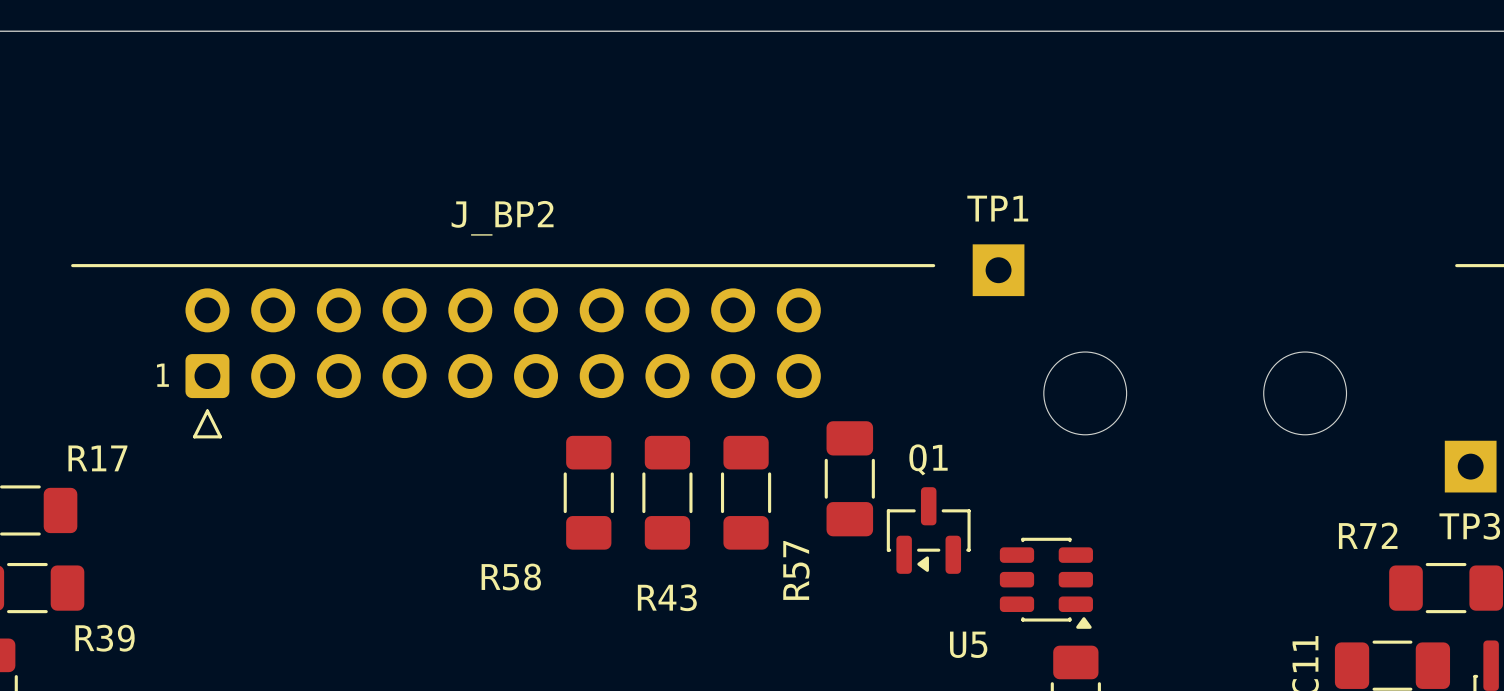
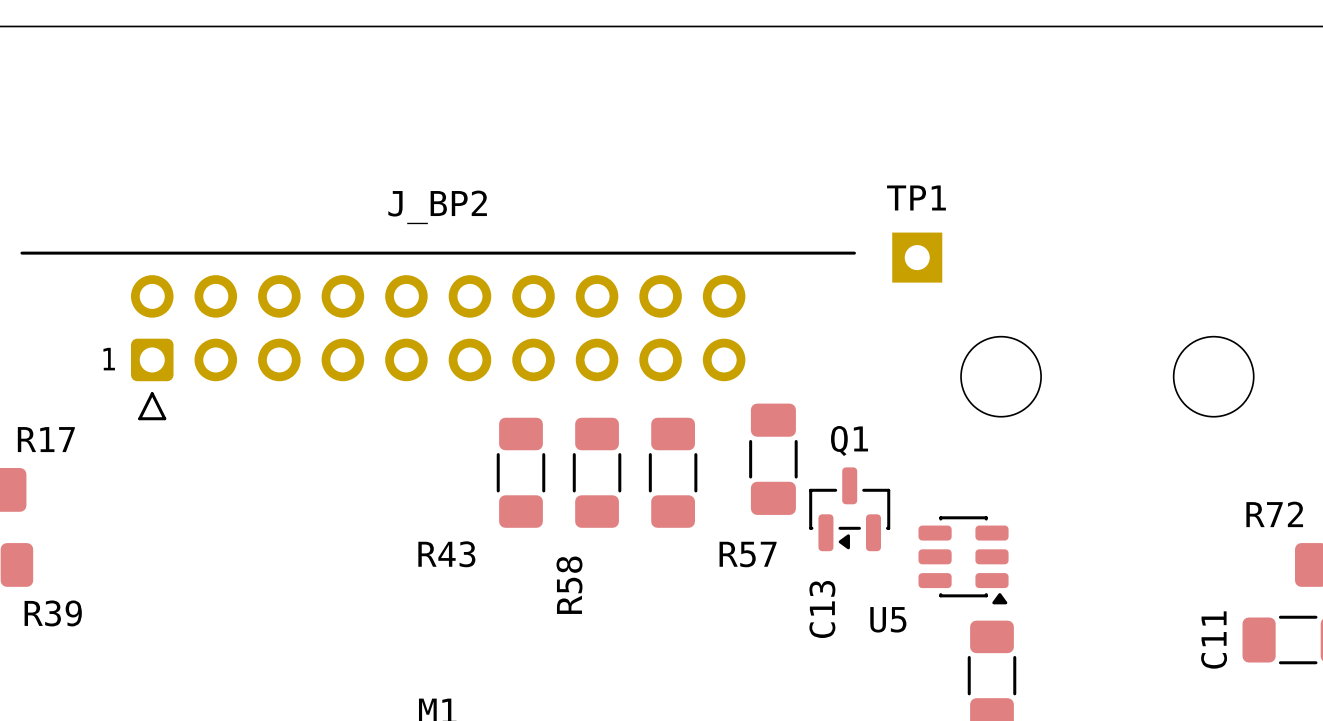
R57 name rotation: 0° (796, 570) -> 90° clockwise (748, 554)
R58 name rotation: 0° (511, 577) -> 90° counterclockwise (569, 585)
R58 name position: R58 (511, 577) -> R58 (569, 585)
R43 name position: R43 (667, 597) -> R43 (446, 554)
C13 name: none -> C13 (822, 609)

